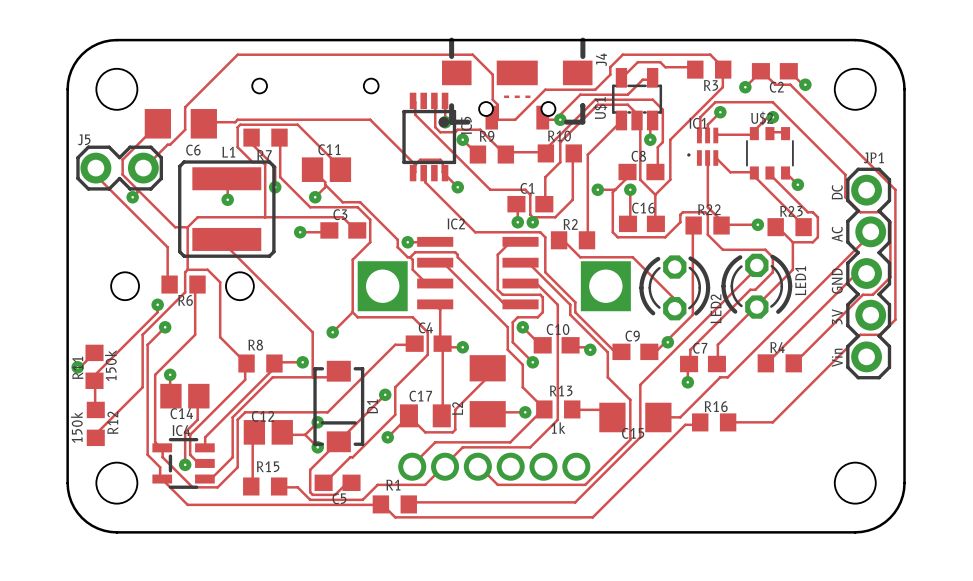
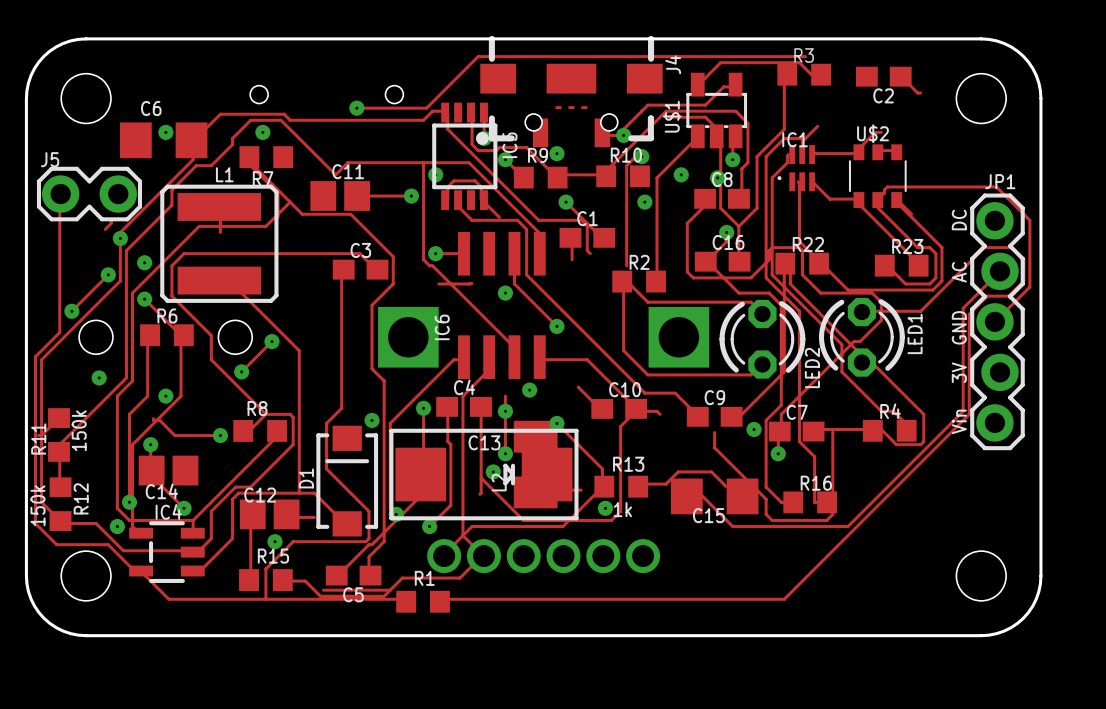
track: (440, 54) (237, 54) (185, 107) (185, 129) (143, 168) -> (478, 56) (426, 108) (356, 108)
track: (472, 54) (492, 74) (492, 99) (497, 104) (497, 119) (491, 117) -> none
track: (622, 54) (610, 67) (610, 74) (595, 89) (545, 89) (515, 119) (492, 119) -> (699, 56) (517, 56)
track: (710, 54) (722, 67) (722, 87) (670, 139) -> (787, 78) (784, 80) (784, 129) (757, 156) (757, 159)
track: (637, 62) (660, 62) (665, 67) (692, 67) (695, 69) -> (717, 65) (720, 62) (799, 62) (814, 77) (821, 78)
via: (805, 84) -> none
R3 name position: R3 (711, 85) -> R3 (804, 55)
track: (745, 87) (760, 71) (775, 84) (790, 84) (867, 162) -> none
via: (745, 87) -> none
via: none -> (356, 108)
track: none -> (445, 110) (432, 111) (423, 120) (290, 120) (284, 114) (220, 114) (193, 140) (193, 159) (120, 232) (120, 280) (41, 359) (41, 502) (62, 523) (96, 523) (123, 550) (184, 550)
track: (597, 104) (560, 142) (560, 162) (545, 177) (544, 204) -> none
via: (720, 112) -> none
via: none -> (165, 132)
via: none -> (262, 132)
via: (772, 117) -> none
track: none -> (802, 138) (784, 138) (766, 156) (766, 277) (799, 311) (799, 441) (814, 456) (814, 502) (817, 502)
track: (157, 123) (122, 159) (122, 174) (175, 227) (187, 227) -> none
track: (203, 123) (235, 122) (237, 119) (370, 119) (415, 164) (420, 159) (440, 159) -> (447, 190) (447, 186) (453, 180) (475, 180) (478, 183)
via: none -> (556, 153)
track: none -> (788, 154) (787, 162) (772, 177) (772, 274) (841, 344) (841, 371) (881, 411) (893, 411) (908, 428)
track: (699, 135) (700, 117) (715, 102) (772, 102) (845, 174) (845, 197) (860, 212) -> (861, 312) (920, 311) (984, 247) (987, 247)
track: (279, 137) (280, 177) (310, 207) (357, 207) -> (247, 153) (247, 159) (302, 214) (350, 214) (378, 241)
track: none -> (641, 156) (635, 156) (626, 165) (626, 265)
via: none -> (641, 156)
track: none -> (423, 162) (423, 259) (429, 265) (432, 265) (511, 344) (511, 356) (514, 357)
C6 name position: C6 (193, 150) -> C6 (151, 108)
via: none -> (435, 174)
via: none -> (681, 174)
track: (573, 153) (572, 199) (555, 217) (532, 217) (532, 222) -> none
via: none -> (717, 177)
track: none -> (798, 181) (799, 241) (847, 290) (932, 290) (941, 280) (941, 247) (894, 202)
track: (707, 158) (707, 207) (725, 224) (721, 225) (757, 224) -> none
track: (95, 168) (97, 177) (167, 247) (167, 282) (169, 284) -> none
track: none -> (353, 194) (353, 196) (411, 196)
track: (312, 169) (325, 182) (325, 187) (315, 197) -> none
track: (340, 169) (340, 167) (297, 124) (240, 124) (237, 127) (237, 147) (252, 162) (262, 162) (265, 164) (265, 217) -> none
via: none -> (411, 196)
track: (769, 173) (807, 212) -> (996, 186) (887, 186) (875, 202) (878, 202) (878, 208) (917, 247) (923, 247)
track: none -> (566, 202) (604, 239)
via: none -> (566, 202)
via: none -> (644, 202)
track: (425, 179) (425, 182) (475, 232) (540, 232) (545, 237) (545, 272) (575, 302) (575, 312) -> (459, 208) (472, 220) (517, 220) (526, 229) (526, 274) (599, 347)
track: (325, 184) (342, 202) (360, 202) (397, 239) (397, 247) (407, 257) (410, 257) -> none
via: (797, 184) -> none
via: (275, 187) -> none
via: (457, 187) -> none
track: (597, 189) (615, 189) -> none
via: (597, 189) -> none
track: (630, 189) (630, 222) -> (726, 232) (726, 241) (708, 259)
via: (630, 189) -> none
via position: (132, 197) -> (120, 238)
via: (315, 197) -> none
via: (227, 199) -> none
via: none -> (726, 232)
track: none -> (435, 253) (463, 253)
track: none -> (514, 253) (514, 283) (556, 326)
via: (517, 222) -> none
via: (532, 222) -> none
track: none -> (705, 261) (738, 293) (769, 293) (781, 305) (781, 405) (766, 420) (766, 487) (783, 502)
via: none -> (144, 262)
via: (757, 224) -> none
track: none -> (789, 263) (790, 283) (860, 353) (861, 362) (872, 362) (923, 414) (923, 441) (920, 444) (896, 444) (881, 429) (817, 429) (817, 431)
track: (870, 231) (872, 232) (727, 377) (720, 377) (680, 417) (658, 417) -> (1000, 271) (963, 308) (963, 411) (847, 526) (732, 526) (691, 486)
track: (300, 232) (327, 232) -> (265, 599) (265, 568) (293, 541) (365, 541) (368, 538) (368, 511) (326, 468) (326, 423) (341, 408) (341, 271)
via: (300, 232) -> none
track: none -> (108, 274) (71, 311)
via: none -> (108, 274)
track: (227, 239) (227, 247) (312, 332) (312, 377) -> (220, 280) (229, 280) (299, 350) (299, 493)
track: (890, 239) (890, 277) (872, 294) (862, 294) (793, 363) -> none
track: (520, 241) (510, 242) (497, 254) (497, 289) (502, 294) (540, 294) -> none
via position: (407, 242) -> (435, 253)
track: none -> (623, 283) (623, 350) (641, 368)
track: (792, 242) (792, 269) (717, 344) (716, 364) -> none
track: (895, 244) (895, 319) (880, 334) (860, 334) (845, 349) -> (1023, 280) (1008, 296) (987, 296) (969, 314) (969, 414)
via: none -> (505, 293)
track: (187, 252) (187, 269) -> none
track: none -> (144, 299) (183, 337)
via: none -> (144, 299)
track: (410, 257) (412, 259) (412, 269) (425, 282) (435, 283) -> none
track: (410, 257) (415, 252) (455, 252) (457, 257) (502, 302) (520, 302) (520, 304) -> none
track: (632, 257) (672, 297) (672, 307) (674, 308) -> (711, 302) (750, 302) (762, 314)
IC6: none -> (501, 305)
track: (435, 262) (435, 264) (445, 264) (507, 327) (507, 349) (522, 364) (522, 387) (542, 407) -> (556, 423) (602, 468) (602, 484)
track: (520, 262) (522, 264) (530, 264) (570, 304) (570, 314) (607, 352) (607, 377) (630, 399) (630, 439) (585, 484) (497, 484) (477, 466) -> none
via: none -> (71, 311)
track: (756, 265) (757, 267) (640, 384) (640, 437) (575, 502) -> (881, 502) (784, 599) (641, 599)
track: (187, 269) (207, 269) (220, 282) (220, 284) -> (171, 296) (211, 335)
track: (187, 269) (185, 272) (185, 292) (155, 322) -> (290, 202) (265, 226) (199, 226) (132, 293) (132, 381)
IC2: (477, 273) -> none
track: (866, 273) (855, 274) (765, 363) -> (994, 321) (1029, 287)
via: none -> (556, 326)
track: (520, 283) (537, 284) (557, 304) (557, 359) -> (539, 357) (541, 359) (587, 359) (636, 408) (620, 426)
track: none -> (150, 337) (147, 338) (147, 396) (129, 414) (129, 502)
track: none -> (271, 341) (241, 371)
via: none -> (271, 341)
track: (542, 297) (542, 312) (537, 317) (517, 317) (512, 322) (512, 342) (532, 362) -> none
R6 name position: R6 (185, 300) -> R6 (167, 316)
track: none -> (463, 357) (462, 359) (453, 359) (390, 423) (390, 508) (396, 514)
track: (157, 304) (157, 312) (150, 319) -> (539, 253) (538, 232) (469, 162) (347, 162) (335, 174) (281, 120) (250, 120) (232, 138) (232, 144) (211, 165) (196, 165) (171, 190) (171, 205) (126, 250) (126, 377)
via: (157, 304) -> none
track: (220, 304) (220, 337) (246, 363) (245, 379) (190, 434) (190, 454) (197, 462) -> (211, 359) (265, 414)
track: (435, 304) (440, 309) (440, 342) (442, 347) (462, 347) -> none
track: none -> (762, 364) (750, 374) (647, 374)
track: (352, 312) (332, 332) -> none
via: none -> (241, 371)
track: (357, 317) (412, 317) (427, 332) (427, 334) -> (489, 357) (487, 359) (487, 371) (462, 396)
track: none -> (378, 374) (384, 381) (384, 541) (368, 556) (368, 572) (366, 573)
track: (580, 317) (612, 349) (620, 349) -> (602, 350) (644, 393) (675, 393) (696, 414)
via: none -> (99, 377)
track: (165, 327) (147, 344) (147, 454) (160, 467) (160, 477) -> (60, 194) (59, 332) (35, 356) (35, 523) (56, 544) (108, 544) (132, 568) (138, 568)
via: (165, 327) -> none
via: (522, 327) -> none
via: none -> (529, 390)
via: (332, 332) -> none
via: none -> (165, 396)
track: none -> (505, 396) (505, 453)
via position: (667, 342) -> (754, 429)
track: (414, 343) (395, 344) (327, 412) (245, 412) (242, 414) -> (347, 523) (314, 493) (238, 493)
track: none -> (447, 406) (447, 441) (450, 444) (450, 505) (429, 526)
via: none -> (423, 408)
track: none -> (265, 414) (250, 429) (243, 430)
via: (590, 349) -> none
track: none -> (153, 418) (153, 420) (159, 420) (174, 435) (220, 435)
via: none -> (372, 420)
track: (427, 354) (395, 387) -> (423, 408) (423, 459)
track: none -> (462, 420) (462, 535) (483, 556)
via: none -> (556, 423)
track: (302, 362) (274, 363) -> none
via: (302, 362) -> none
via: (532, 362) -> none
track: none -> (832, 429) (832, 514) (826, 520) (772, 520) (766, 514) (766, 499) (714, 447) (714, 432)
via: (77, 367) -> none
via: none -> (220, 435)
track: (487, 368) (485, 369) (485, 379) (455, 409) (455, 429) (452, 432) (425, 432) (408, 415) (387, 437) -> none
track: (338, 371) (332, 377) (272, 377) (240, 409) -> (265, 414) (290, 414) (293, 417) (293, 444) (250, 487) (235, 487)
via: none -> (505, 453)
track: (142, 387) (97, 432) (97, 437) (95, 437) -> (117, 459) (117, 508) (129, 520) (193, 520)
track: (385, 394) (310, 469) (310, 492) (312, 494) -> none
via: (385, 394) -> none
track: (198, 396) (197, 419) (185, 432) (185, 464) -> none
track: none -> (149, 472) (184, 508)
via: none -> (493, 471)
C13: none -> (483, 474)
D1 rotation: 0° (338, 406) -> 180° (347, 481)
track: (572, 409) (602, 409) (612, 417) -> (638, 486) (638, 484) (666, 484) (678, 471) (711, 471) (725, 486)
via position: (525, 412) -> (605, 508)
C17: (425, 415) -> none
track: (232, 417) (232, 457) -> (226, 496) (211, 511) (211, 538) (199, 550) (192, 552)
track: (557, 419) (530, 447) (462, 447) (445, 466) -> (620, 499) (620, 511) (611, 520) (523, 520) (481, 478)
via: none -> (129, 502)
track: (317, 422) (305, 434) (317, 447) -> none
via: (317, 422) -> none
track: (700, 422) (697, 424) (685, 424) (592, 517) (395, 517) (380, 504) (187, 504) (185, 502) -> (406, 601) (405, 599) (168, 599)
track: (772, 422) (728, 422) -> none
via: none -> (184, 508)
via: none -> (396, 514)
via position: (387, 437) -> (429, 526)
via: none -> (117, 526)
track: (162, 447) (162, 457) (192, 487) (217, 487) (237, 467) (237, 452) -> (226, 544) (232, 538)
via: (317, 447) -> none
via: none -> (275, 541)
via: (185, 464) -> none
track: (351, 482) (350, 484) (345, 484) (335, 494) -> (390, 590) (350, 590)

